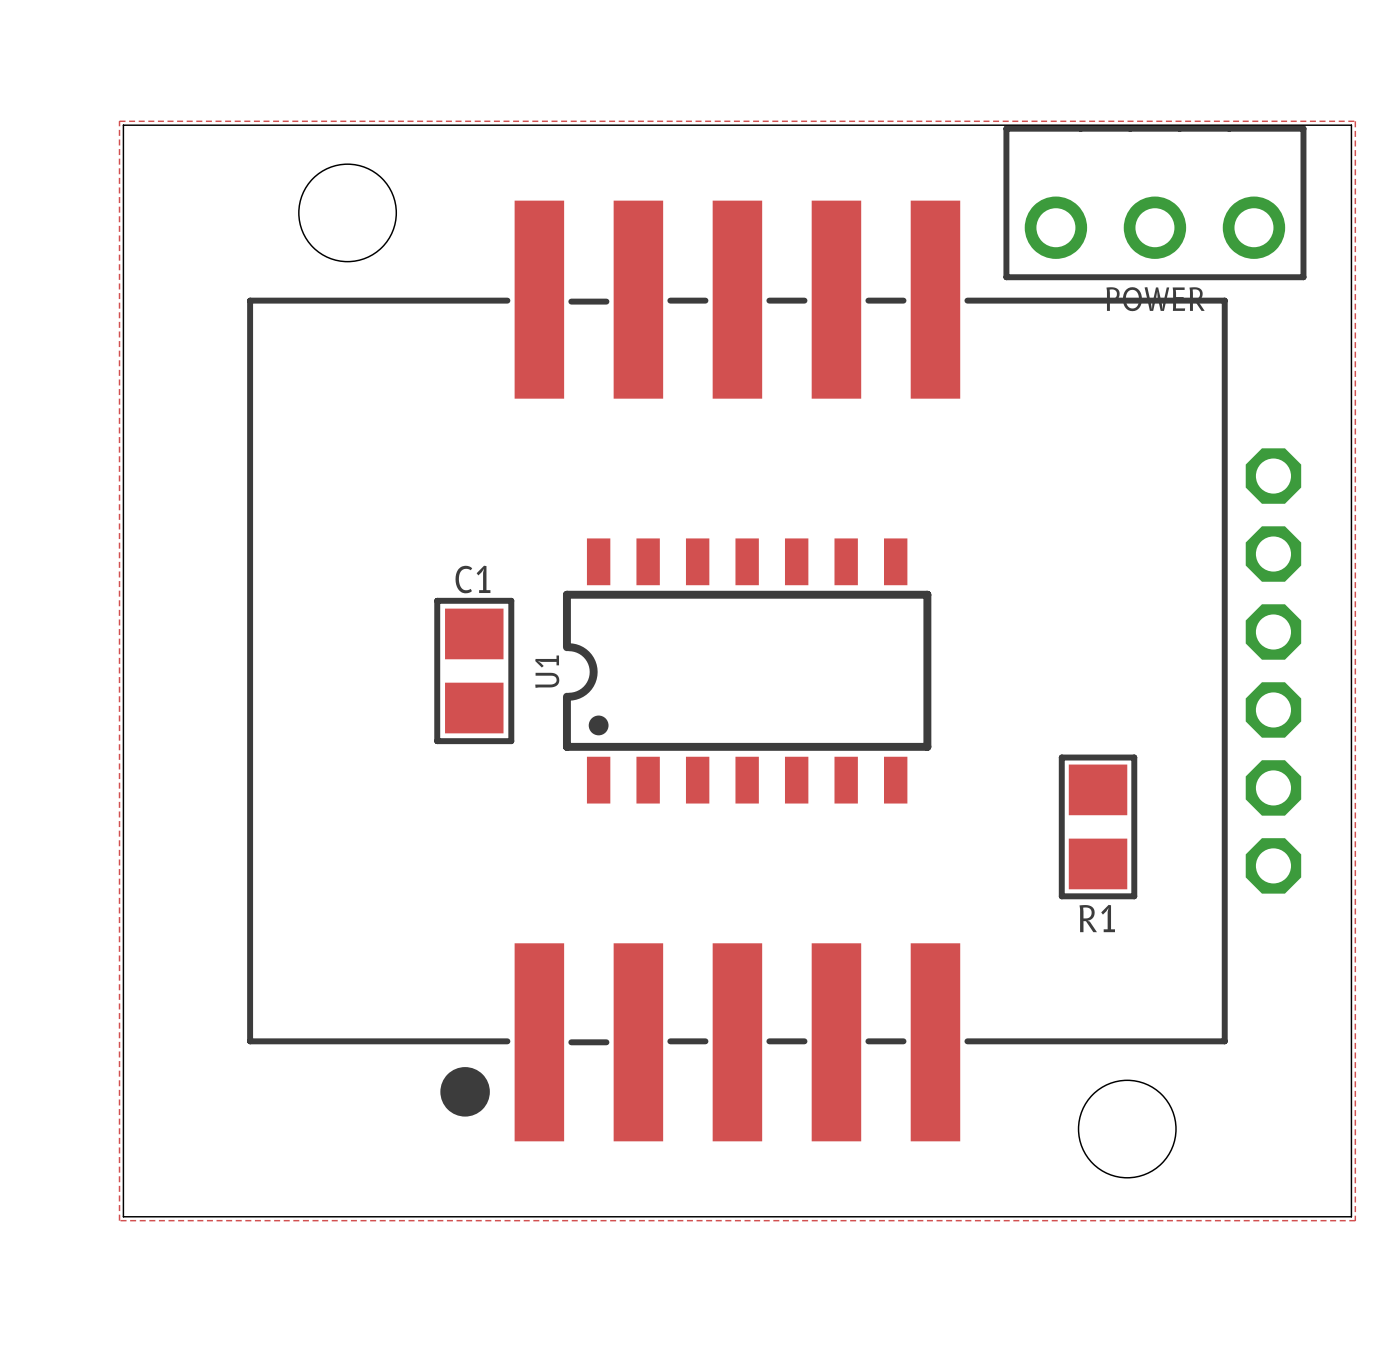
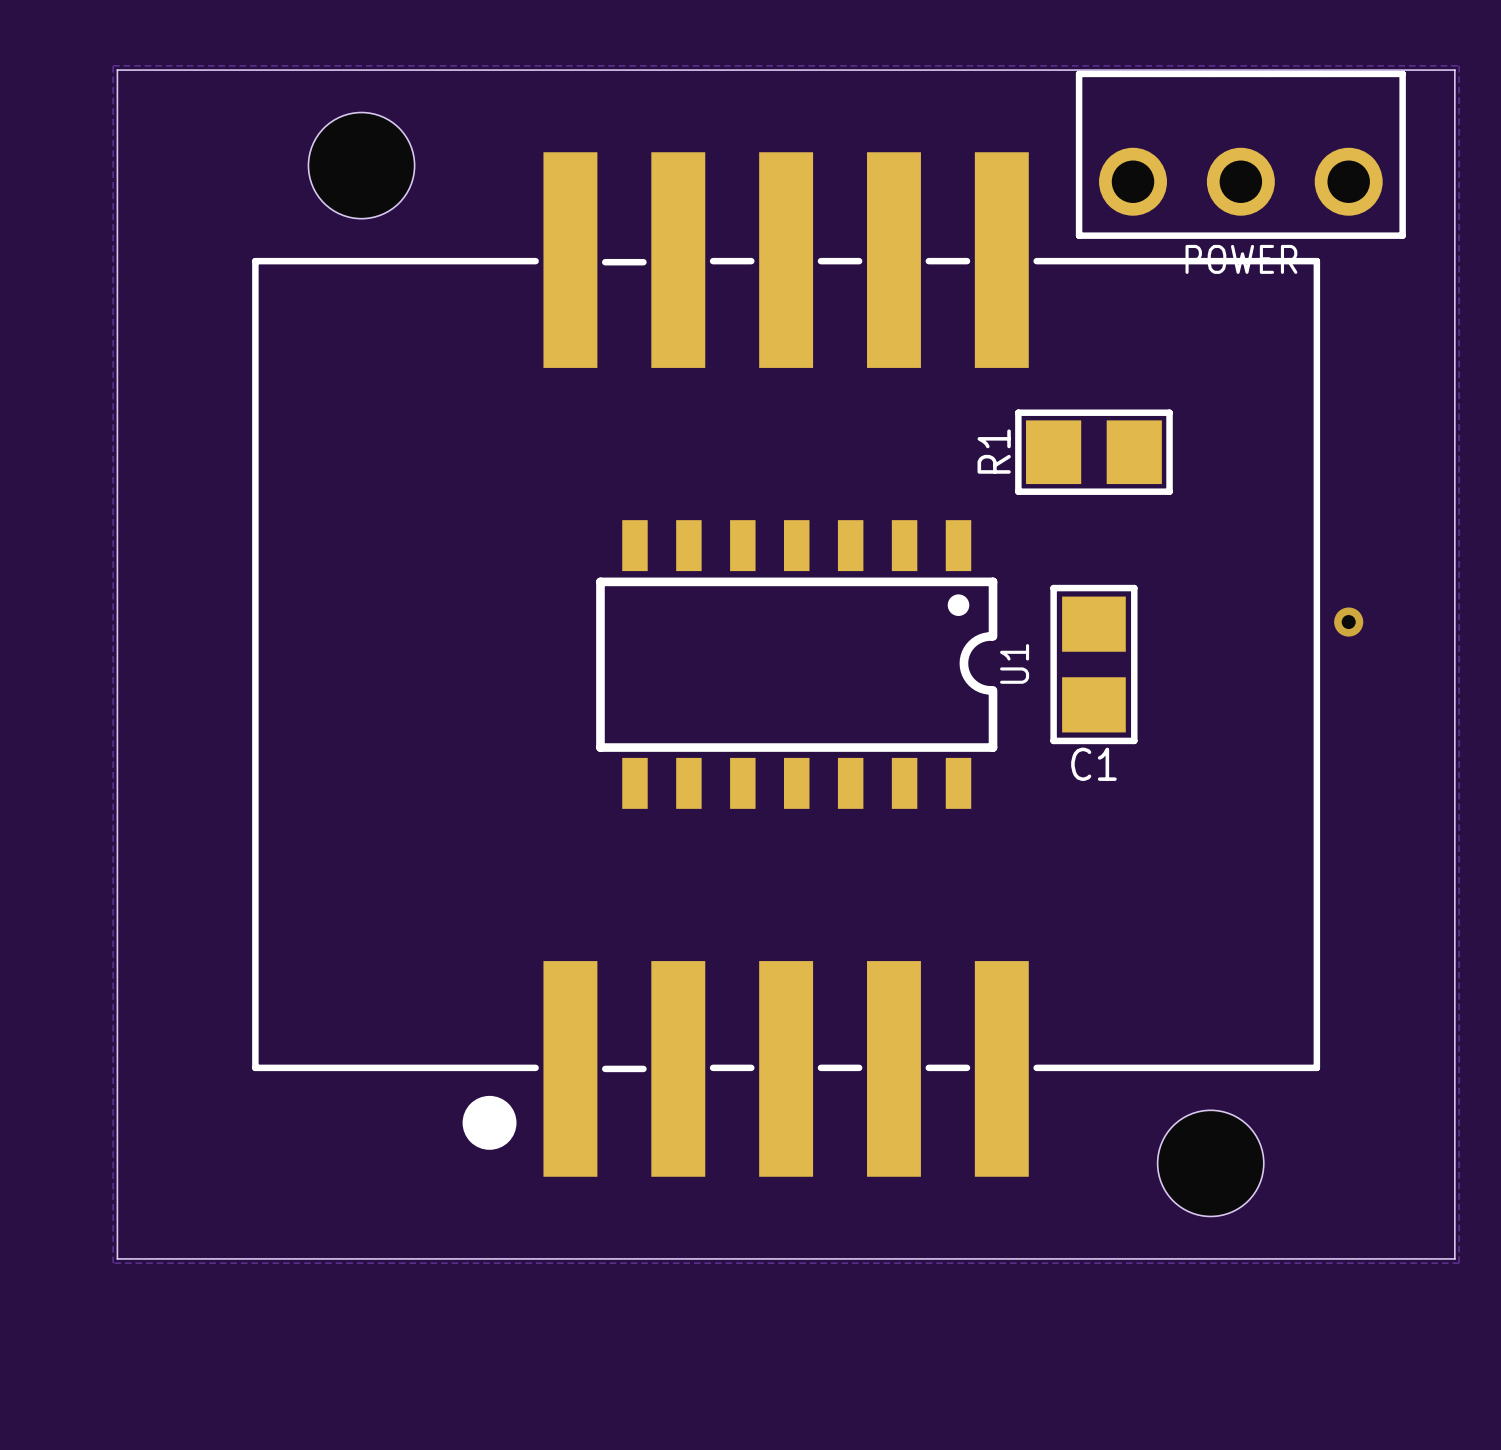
C1 name position: C1 (472, 579) -> C1 (1093, 764)
via: none -> (1348, 622)
C1 position: (474, 670) -> (1093, 664)
U1 rotation: 0° (747, 670) -> 180° (796, 664)
part: (1273, 670) -> none
R1 rotation: 0° (1098, 826) -> 90° clockwise (1093, 452)
R1 position: (1098, 826) -> (1093, 452)

